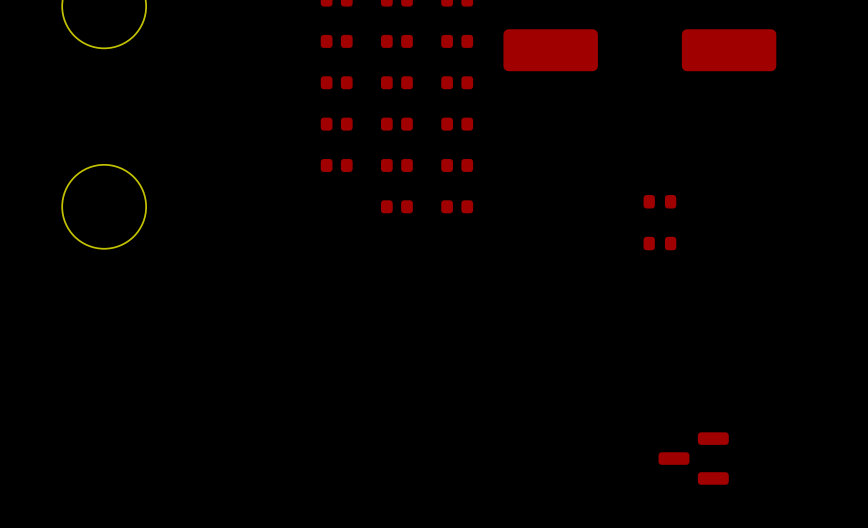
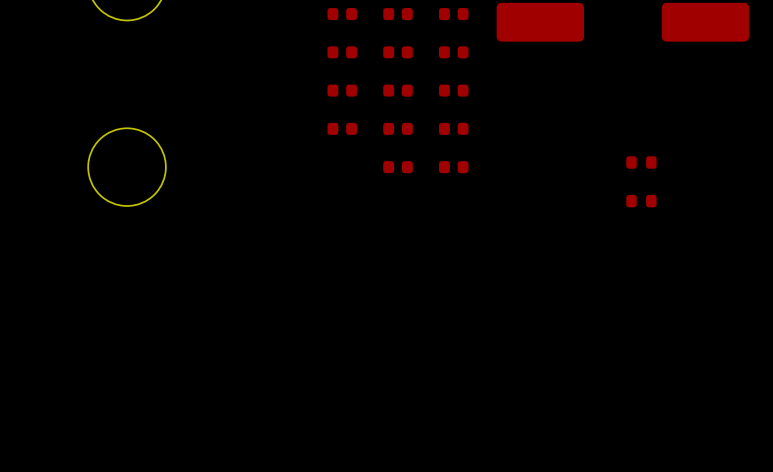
part: (693, 458) -> none

